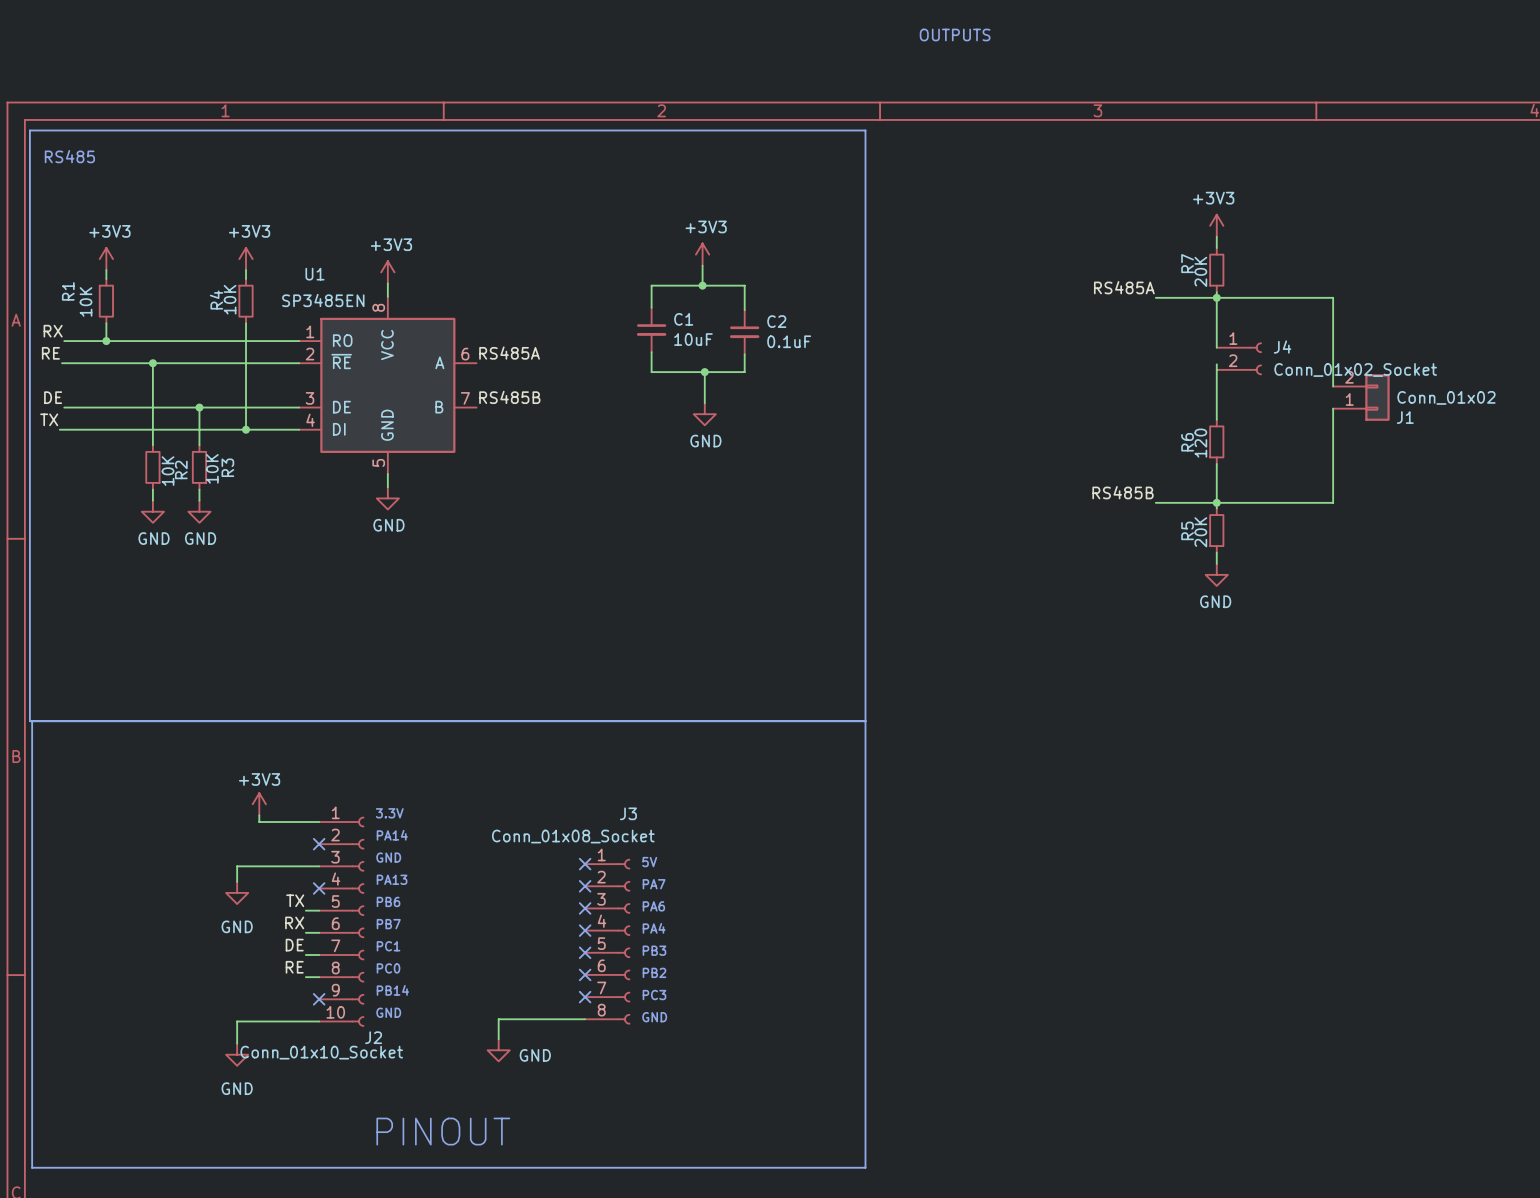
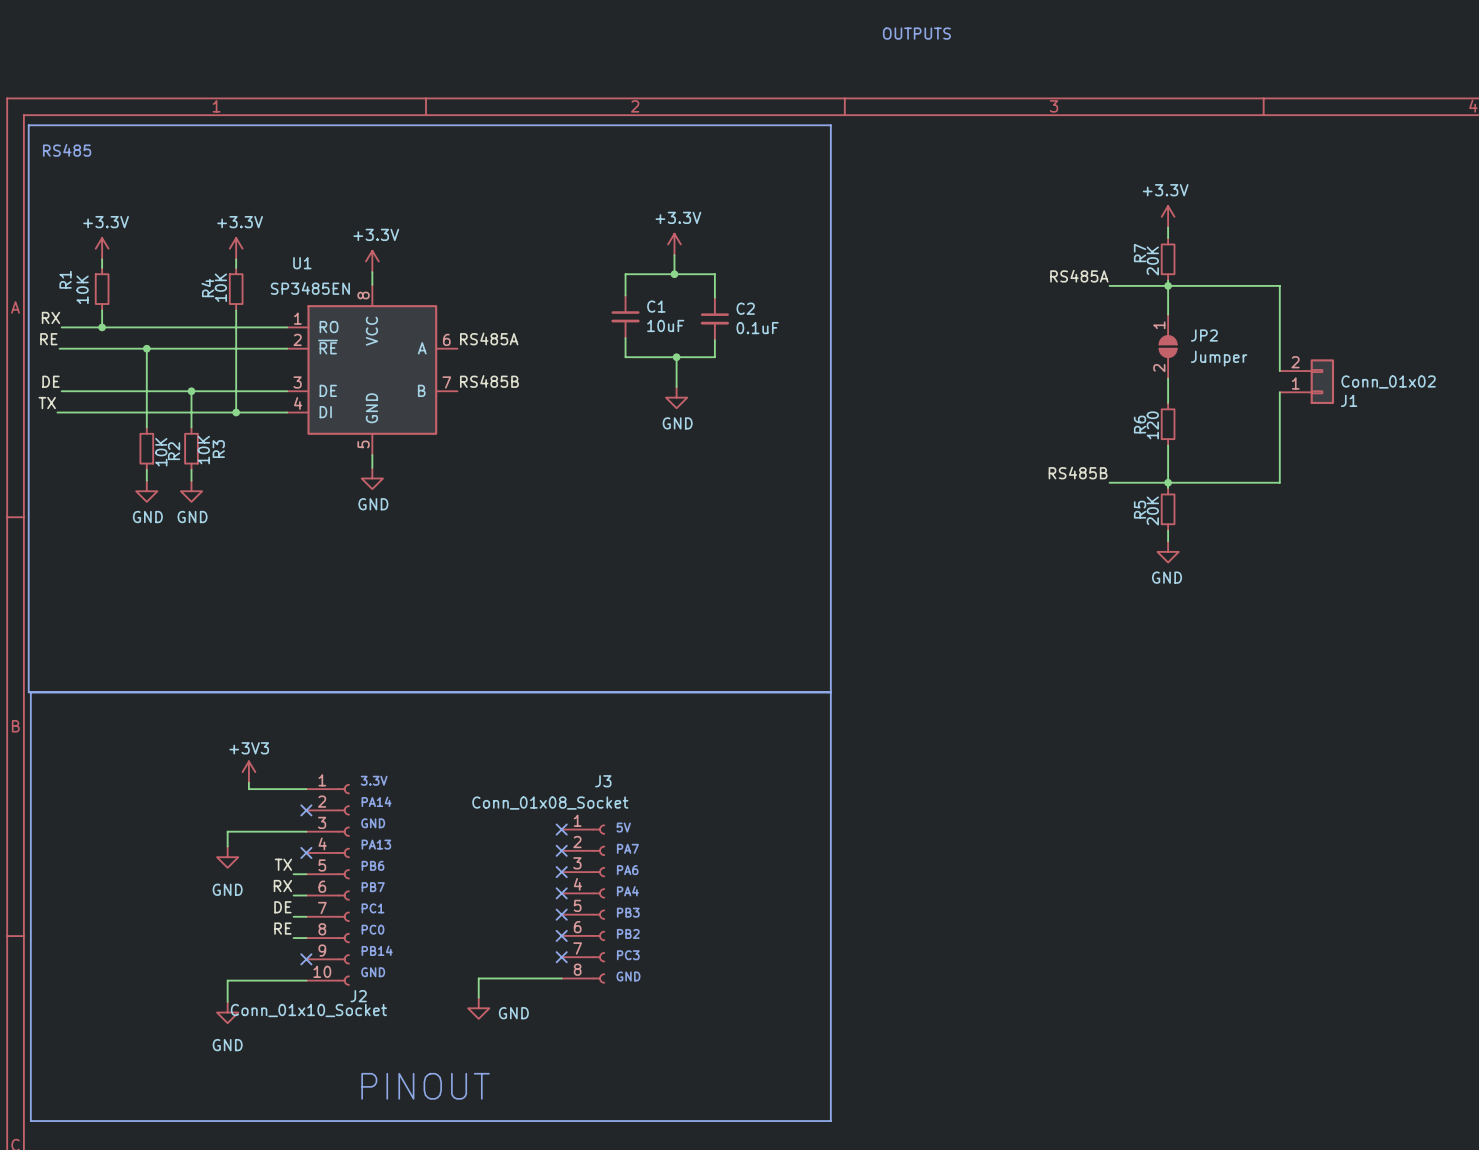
power symbol: +3V3 (1216, 225) -> +3.3V (1168, 216)
power symbol: +3V3 (702, 254) -> +3.3V (674, 244)
power symbol: +3V3 (106, 259) -> +3.3V (102, 248)
power symbol: +3V3 (246, 259) -> +3.3V (236, 248)
power symbol: +3V3 (387, 272) -> +3.3V (372, 261)
J4: Conn_01x02_Socket (1239, 358) -> none
JP2: none -> Jumper (1168, 346)

